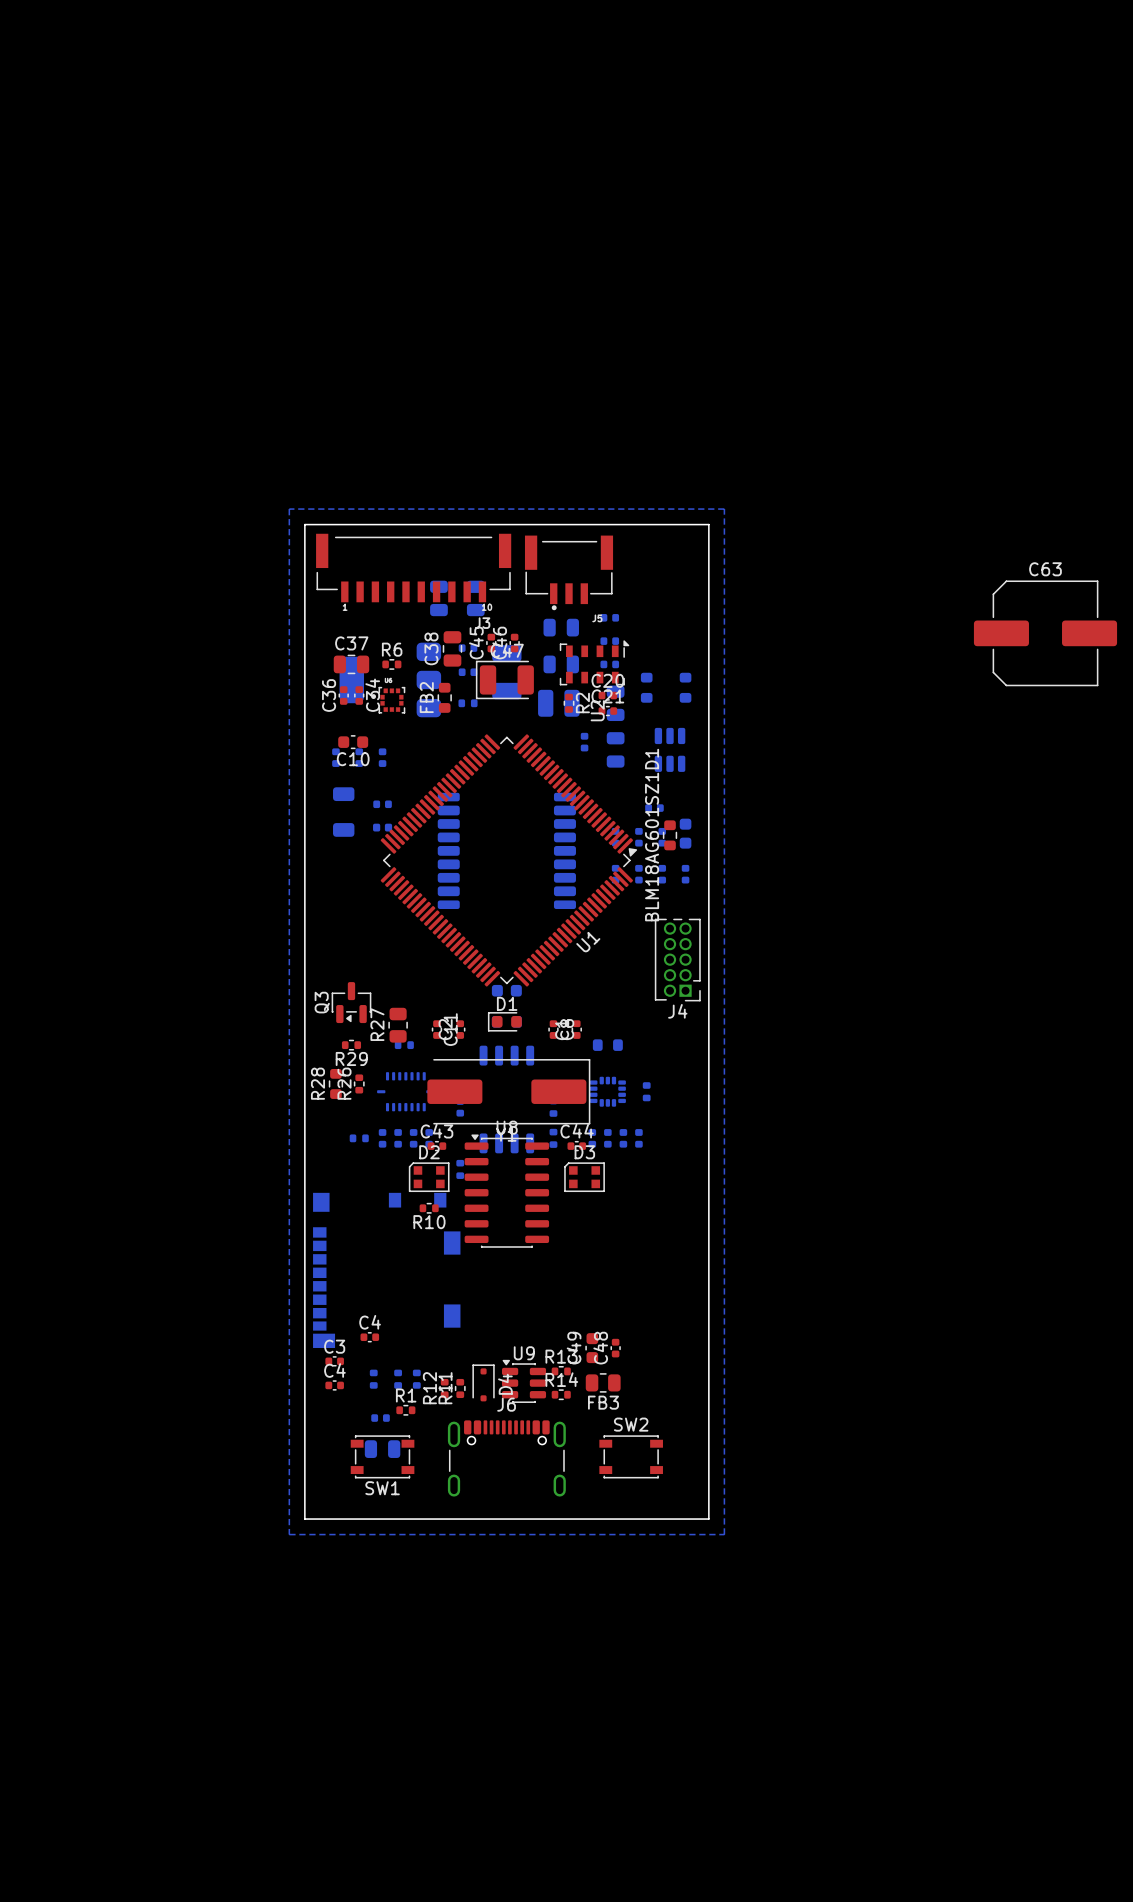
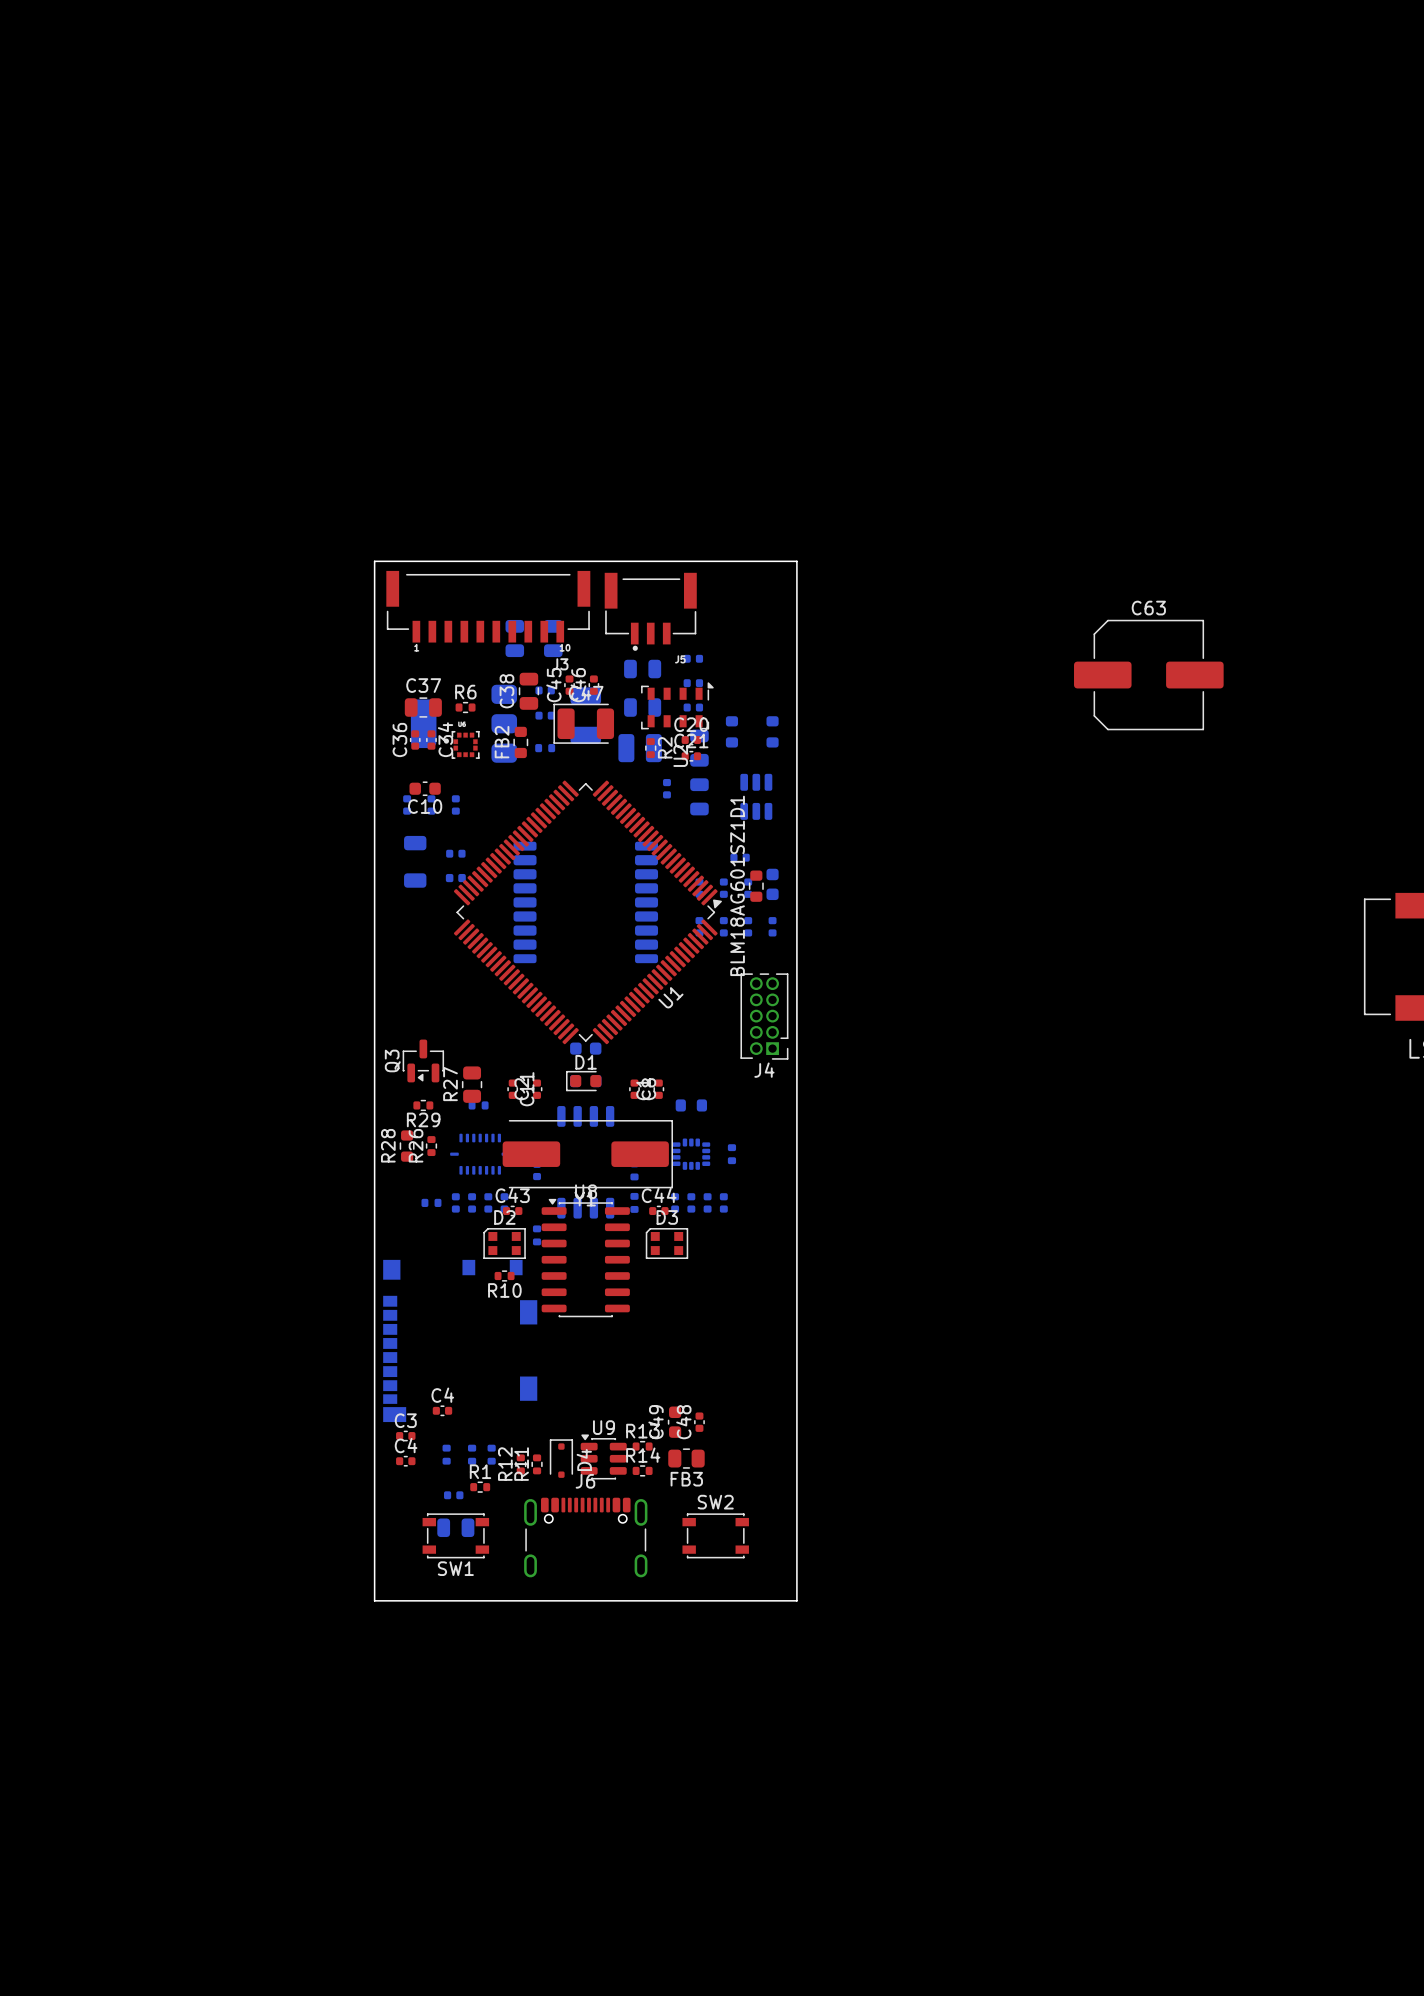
bottom zone outline: (289, 509) (289, 1534) (724, 1534) (724, 509) (289, 509) -> none

